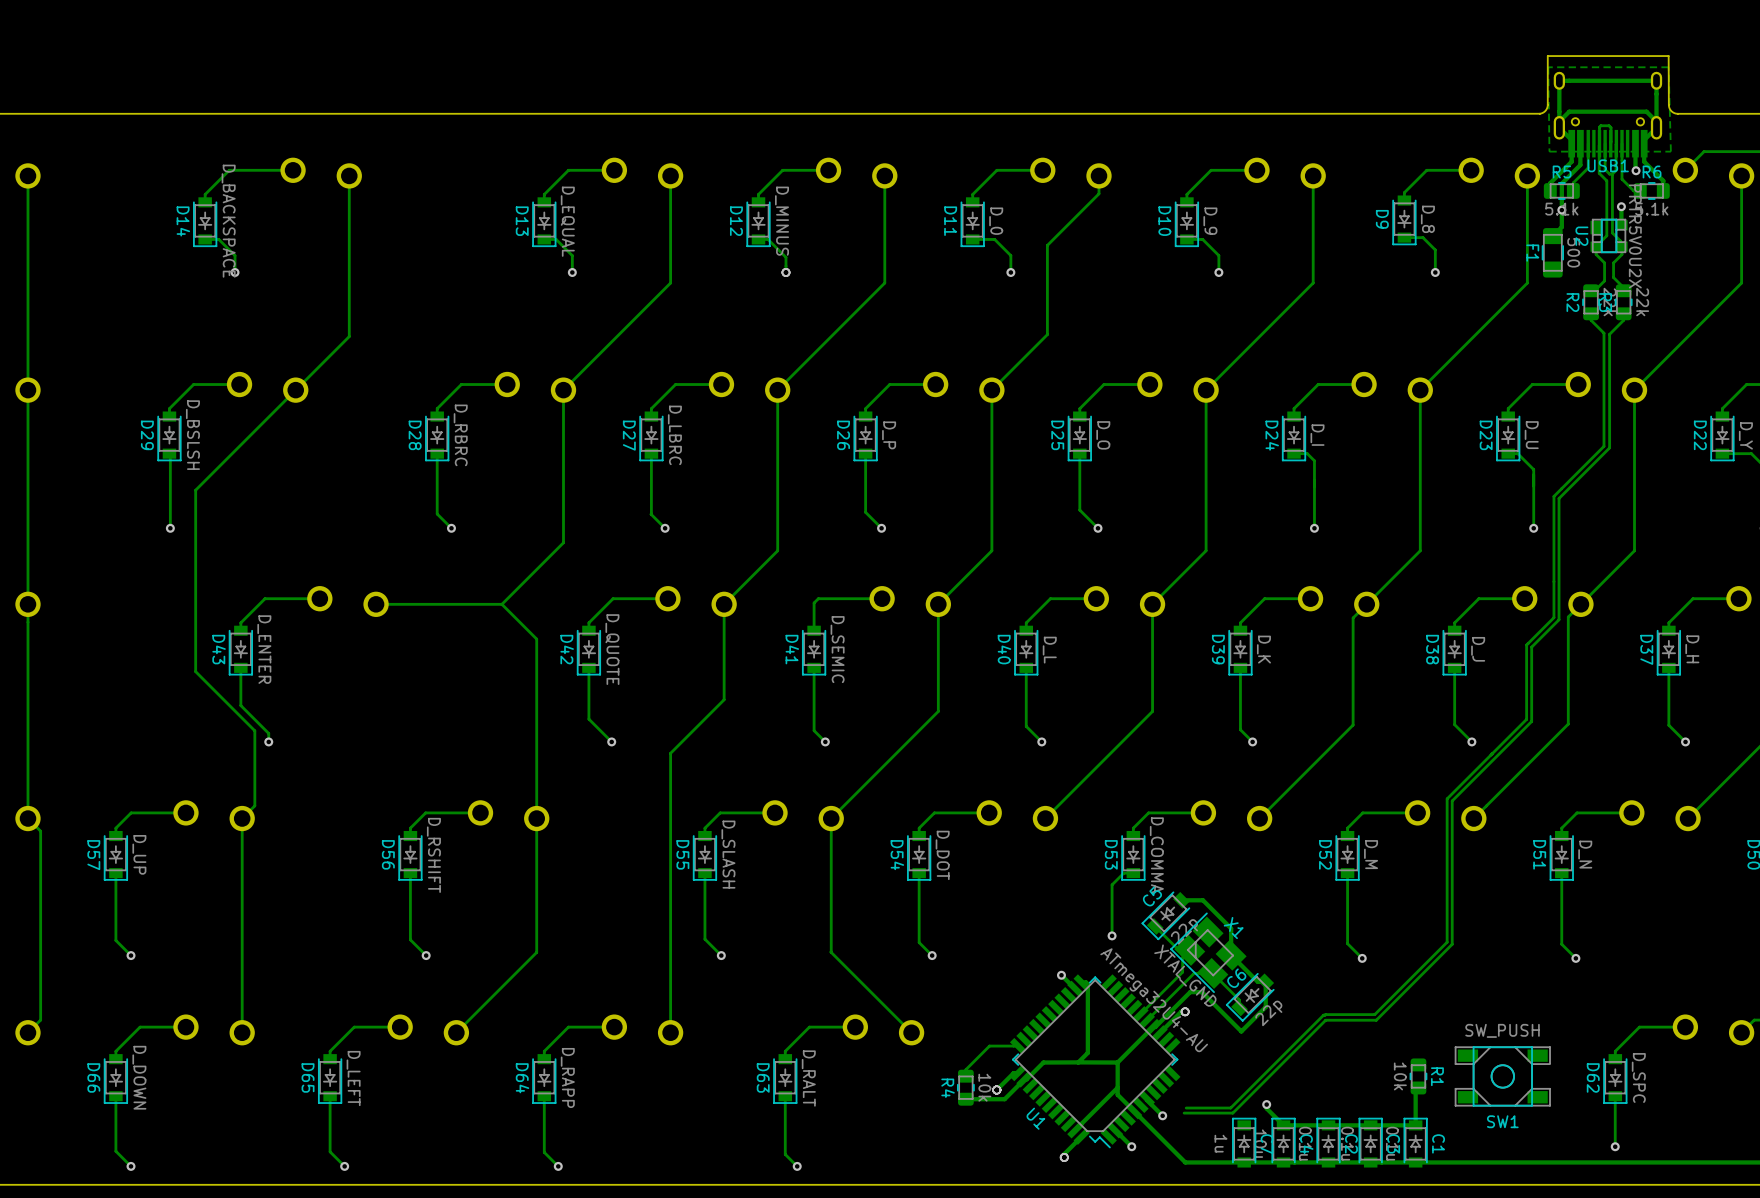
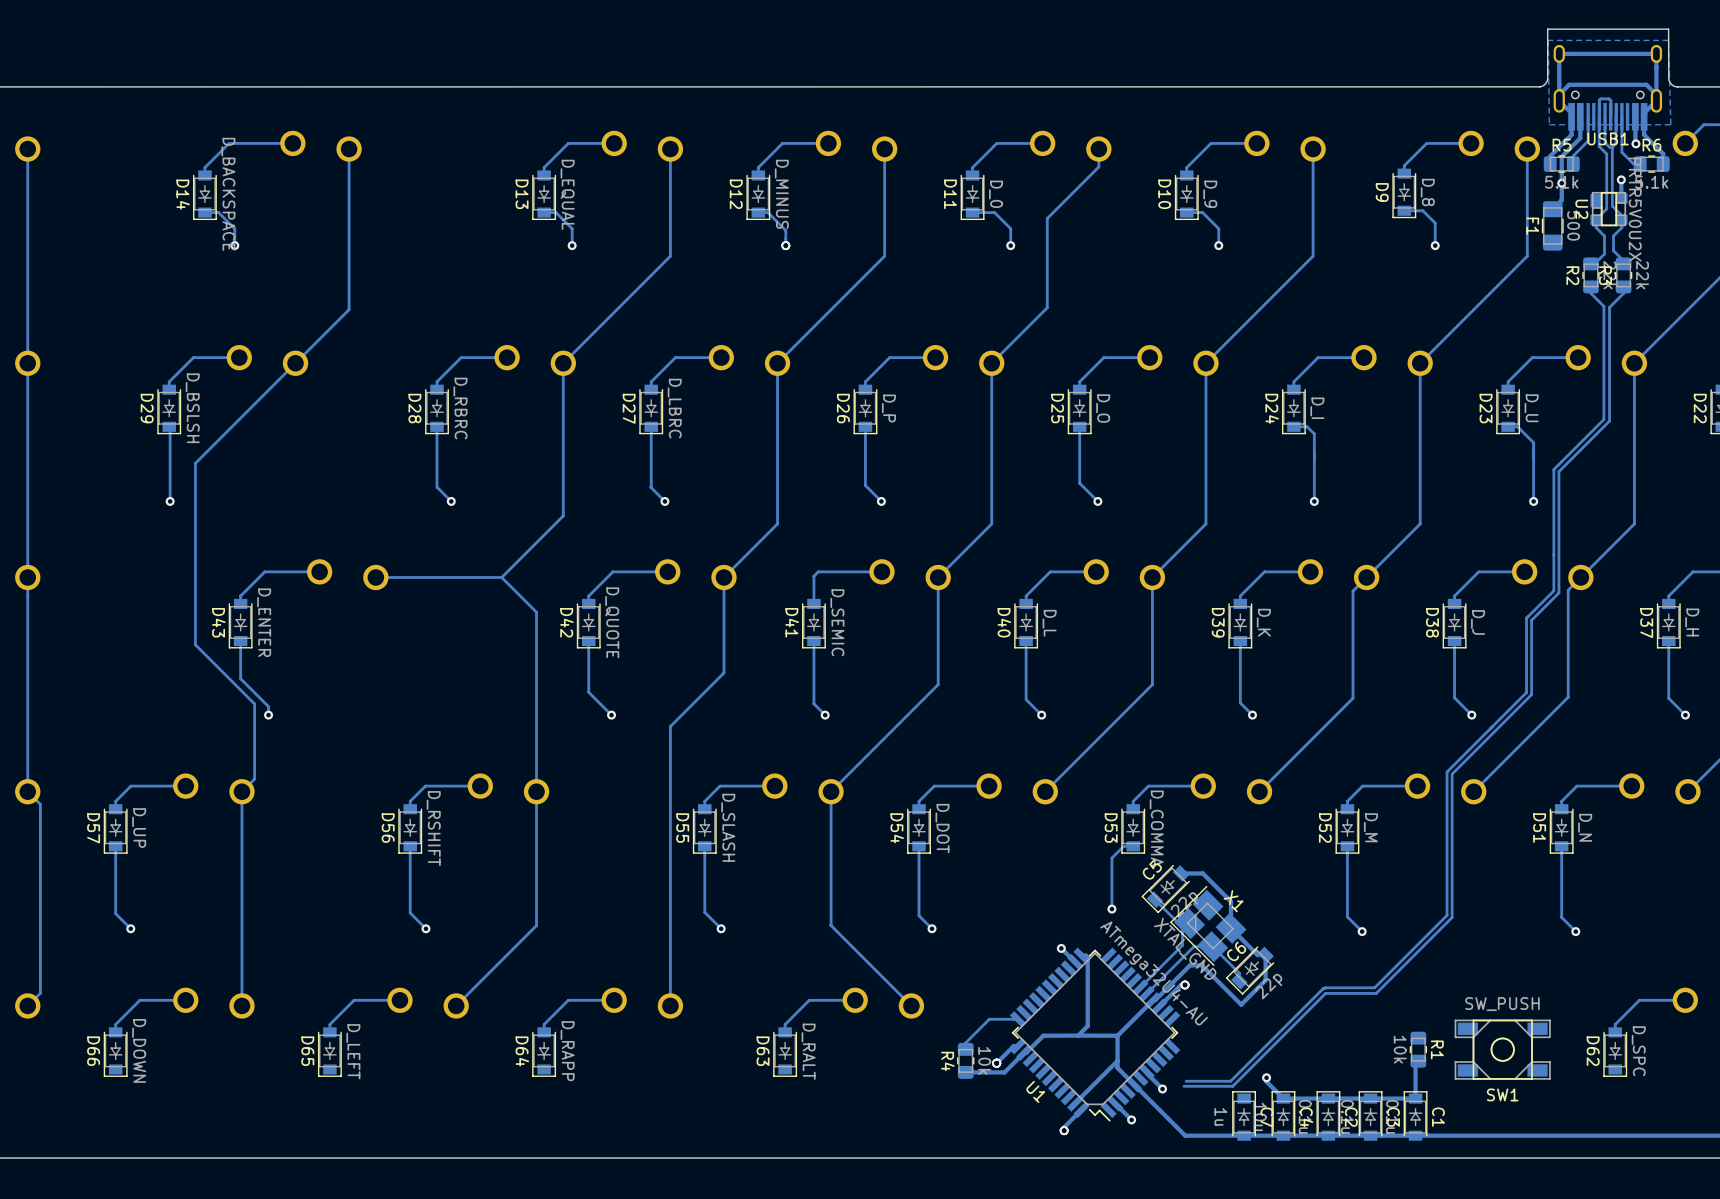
track: (115, 1096) (115, 1151) (131, 1166) -> none
track: (330, 1096) (330, 1151) (344, 1166) -> none
track: (544, 1096) (544, 1152) (558, 1166) -> none
track: (785, 1096) (785, 1154) (797, 1166) -> none
track: (1615, 1096) (1615, 1146) -> none
via: (1615, 1146) -> none
via: (131, 1166) -> none
via: (344, 1166) -> none
via: (558, 1166) -> none
via: (797, 1166) -> none

